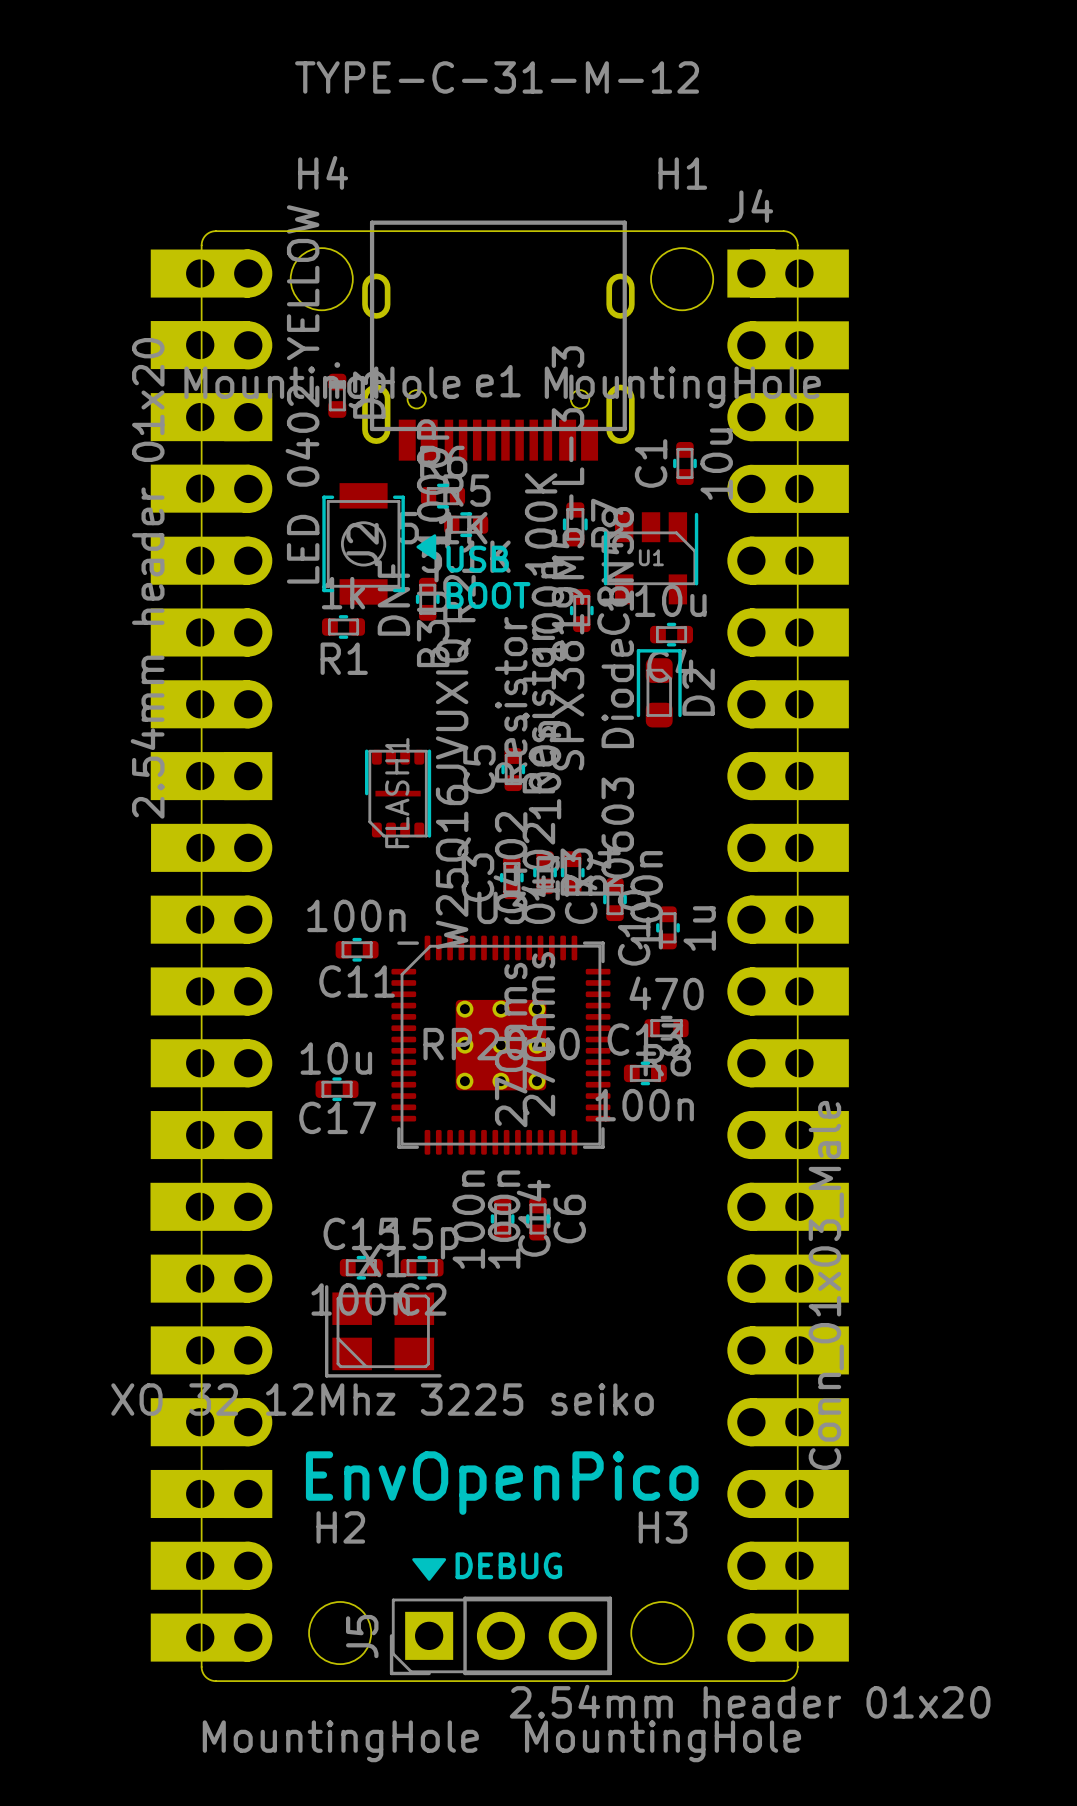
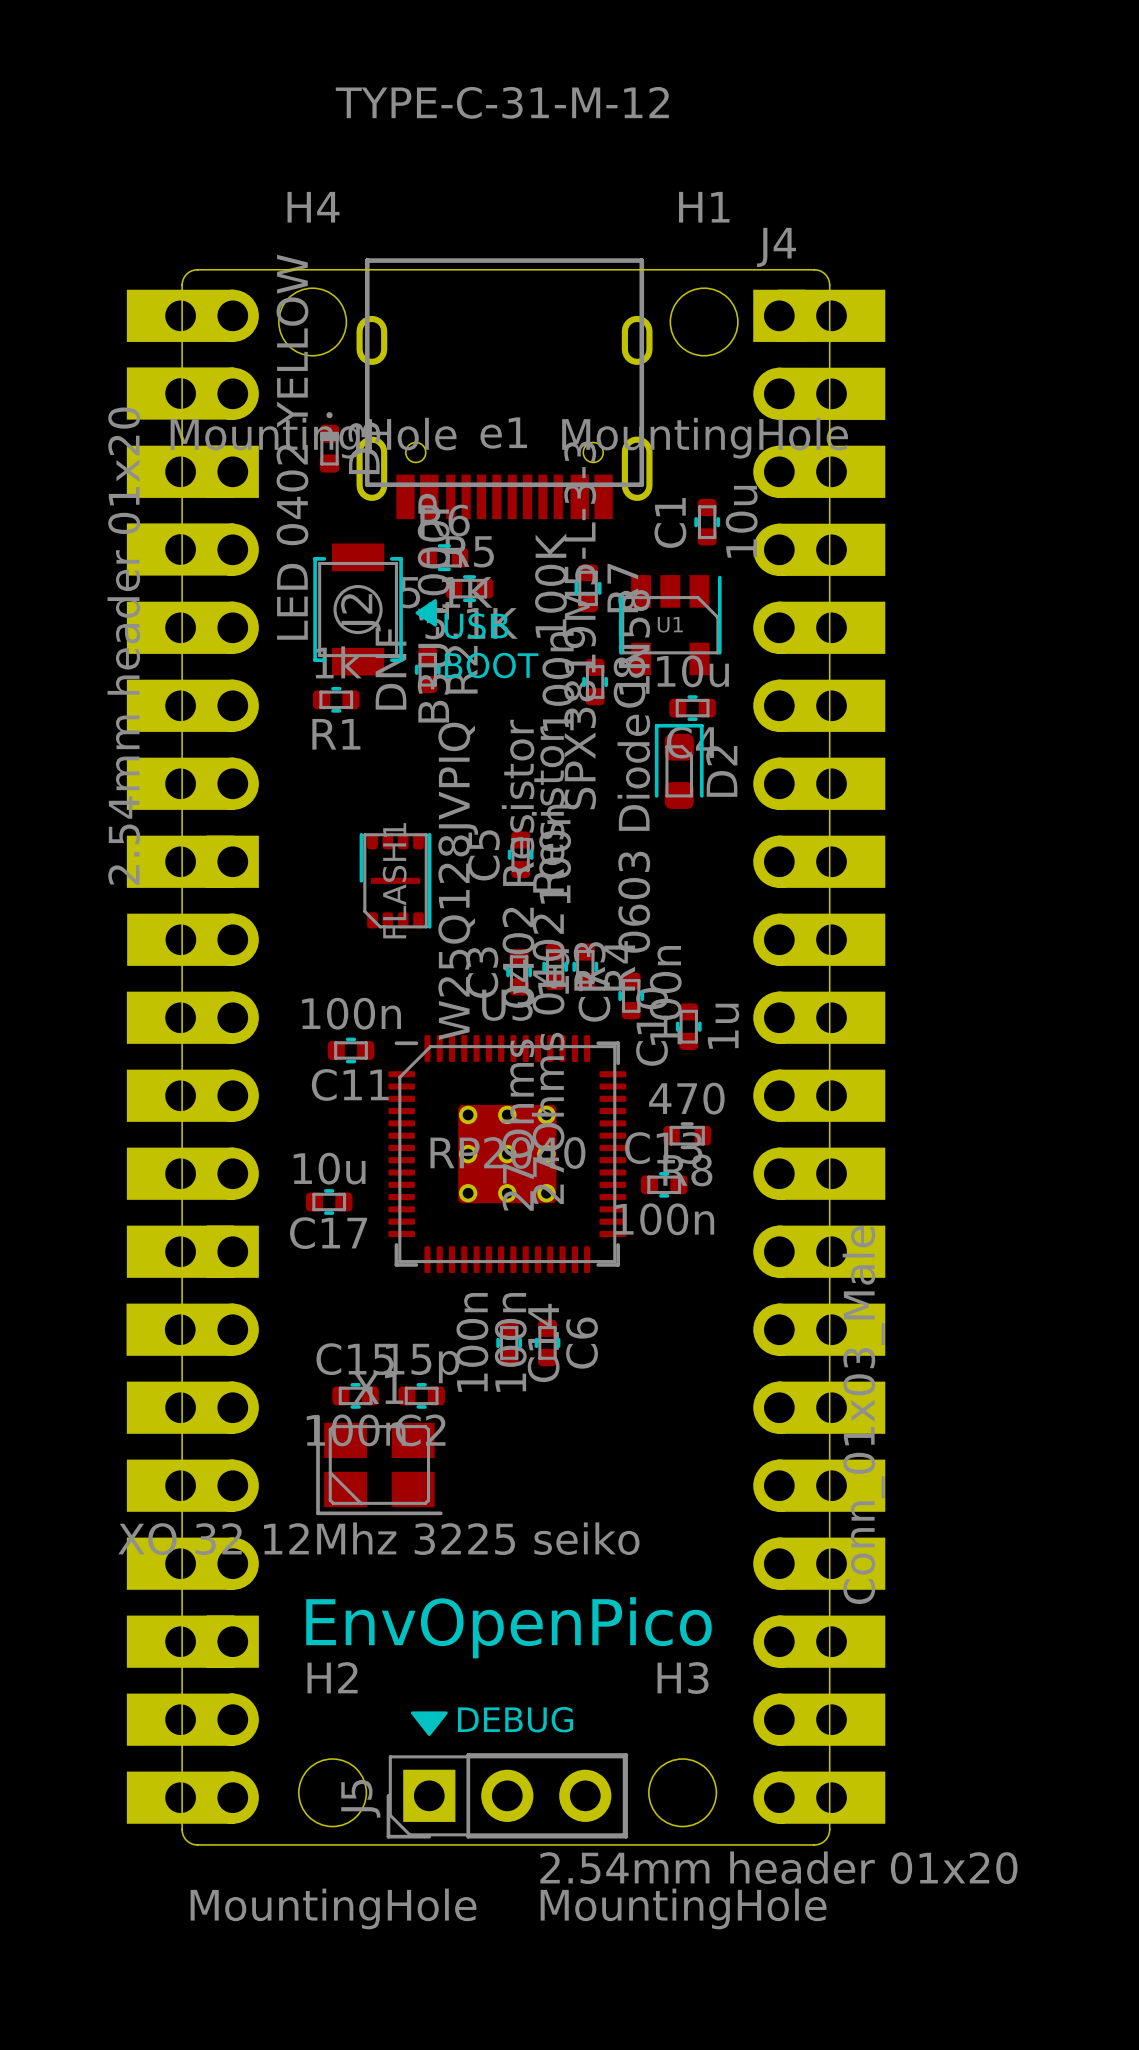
FLASH1 value: W25Q16JVUXIQ (453, 793) -> W25Q128JVPIQ (458, 881)

